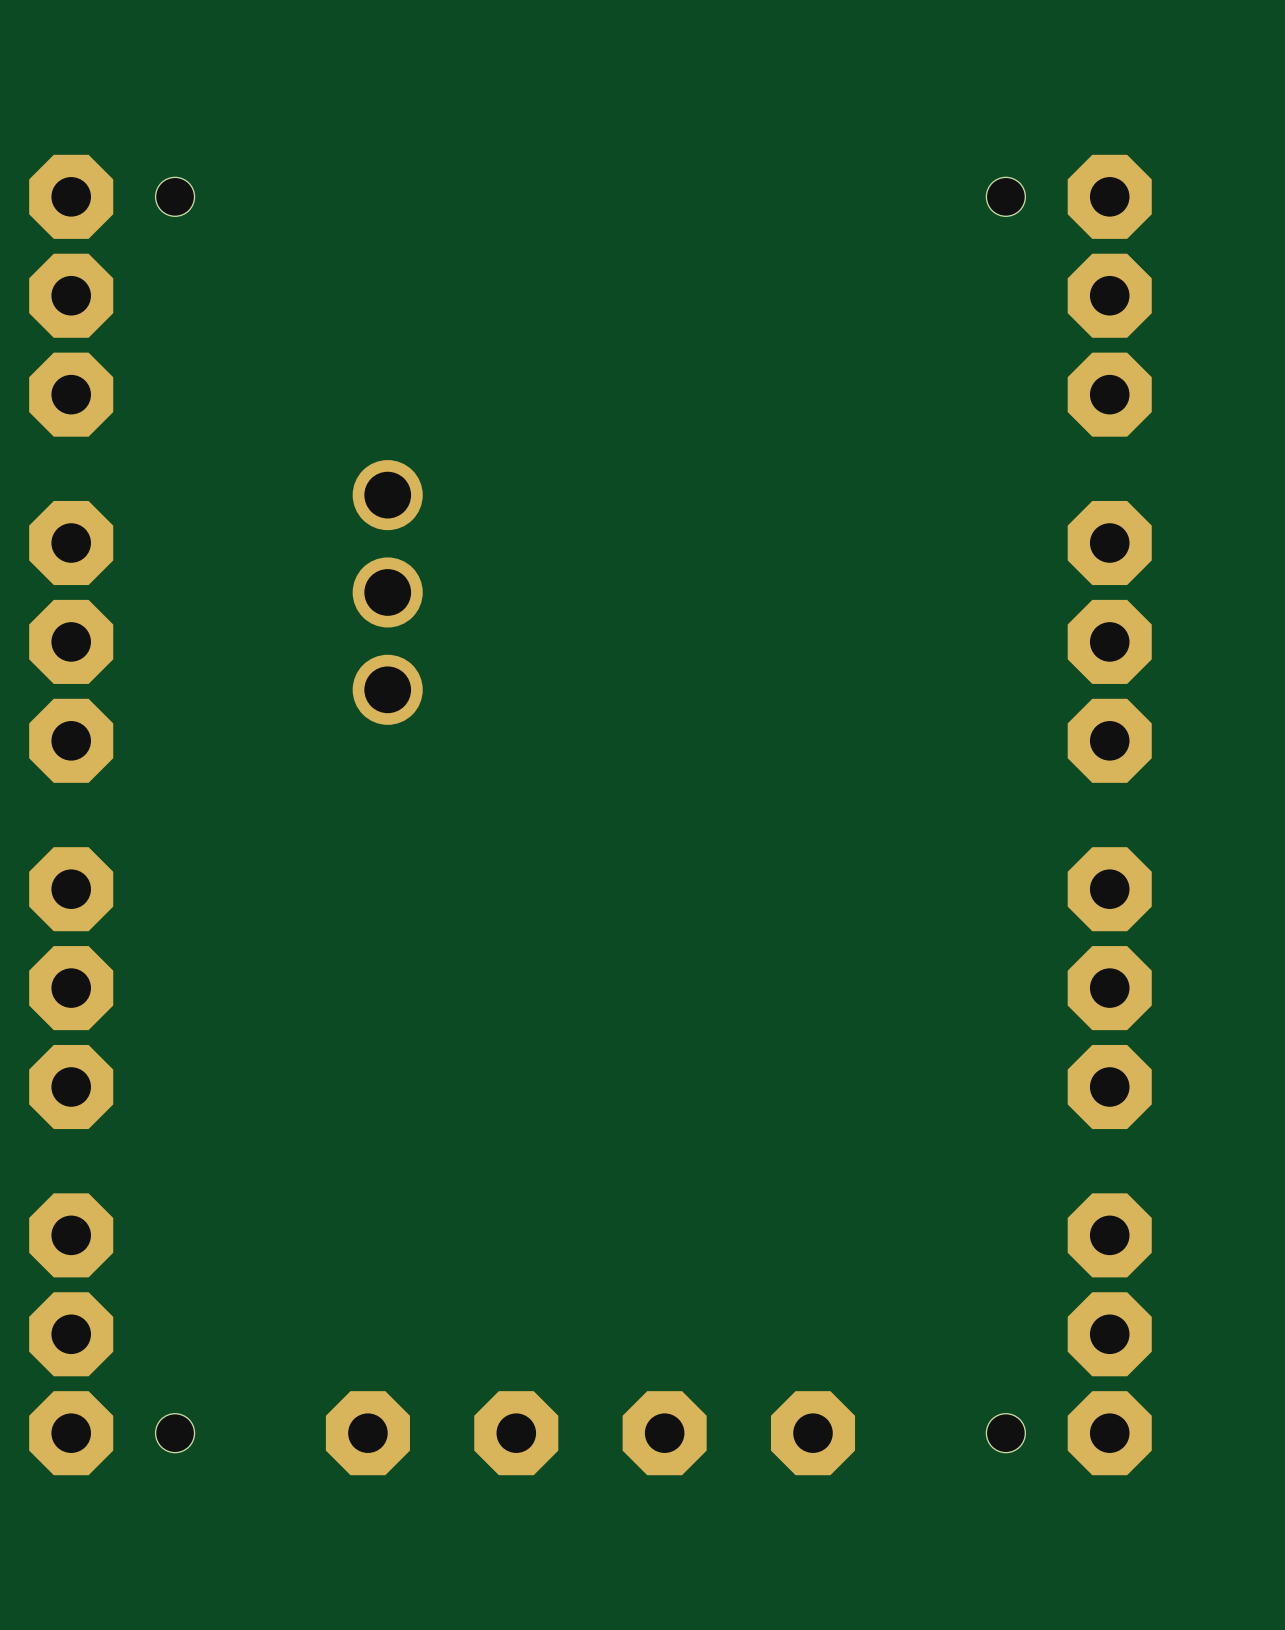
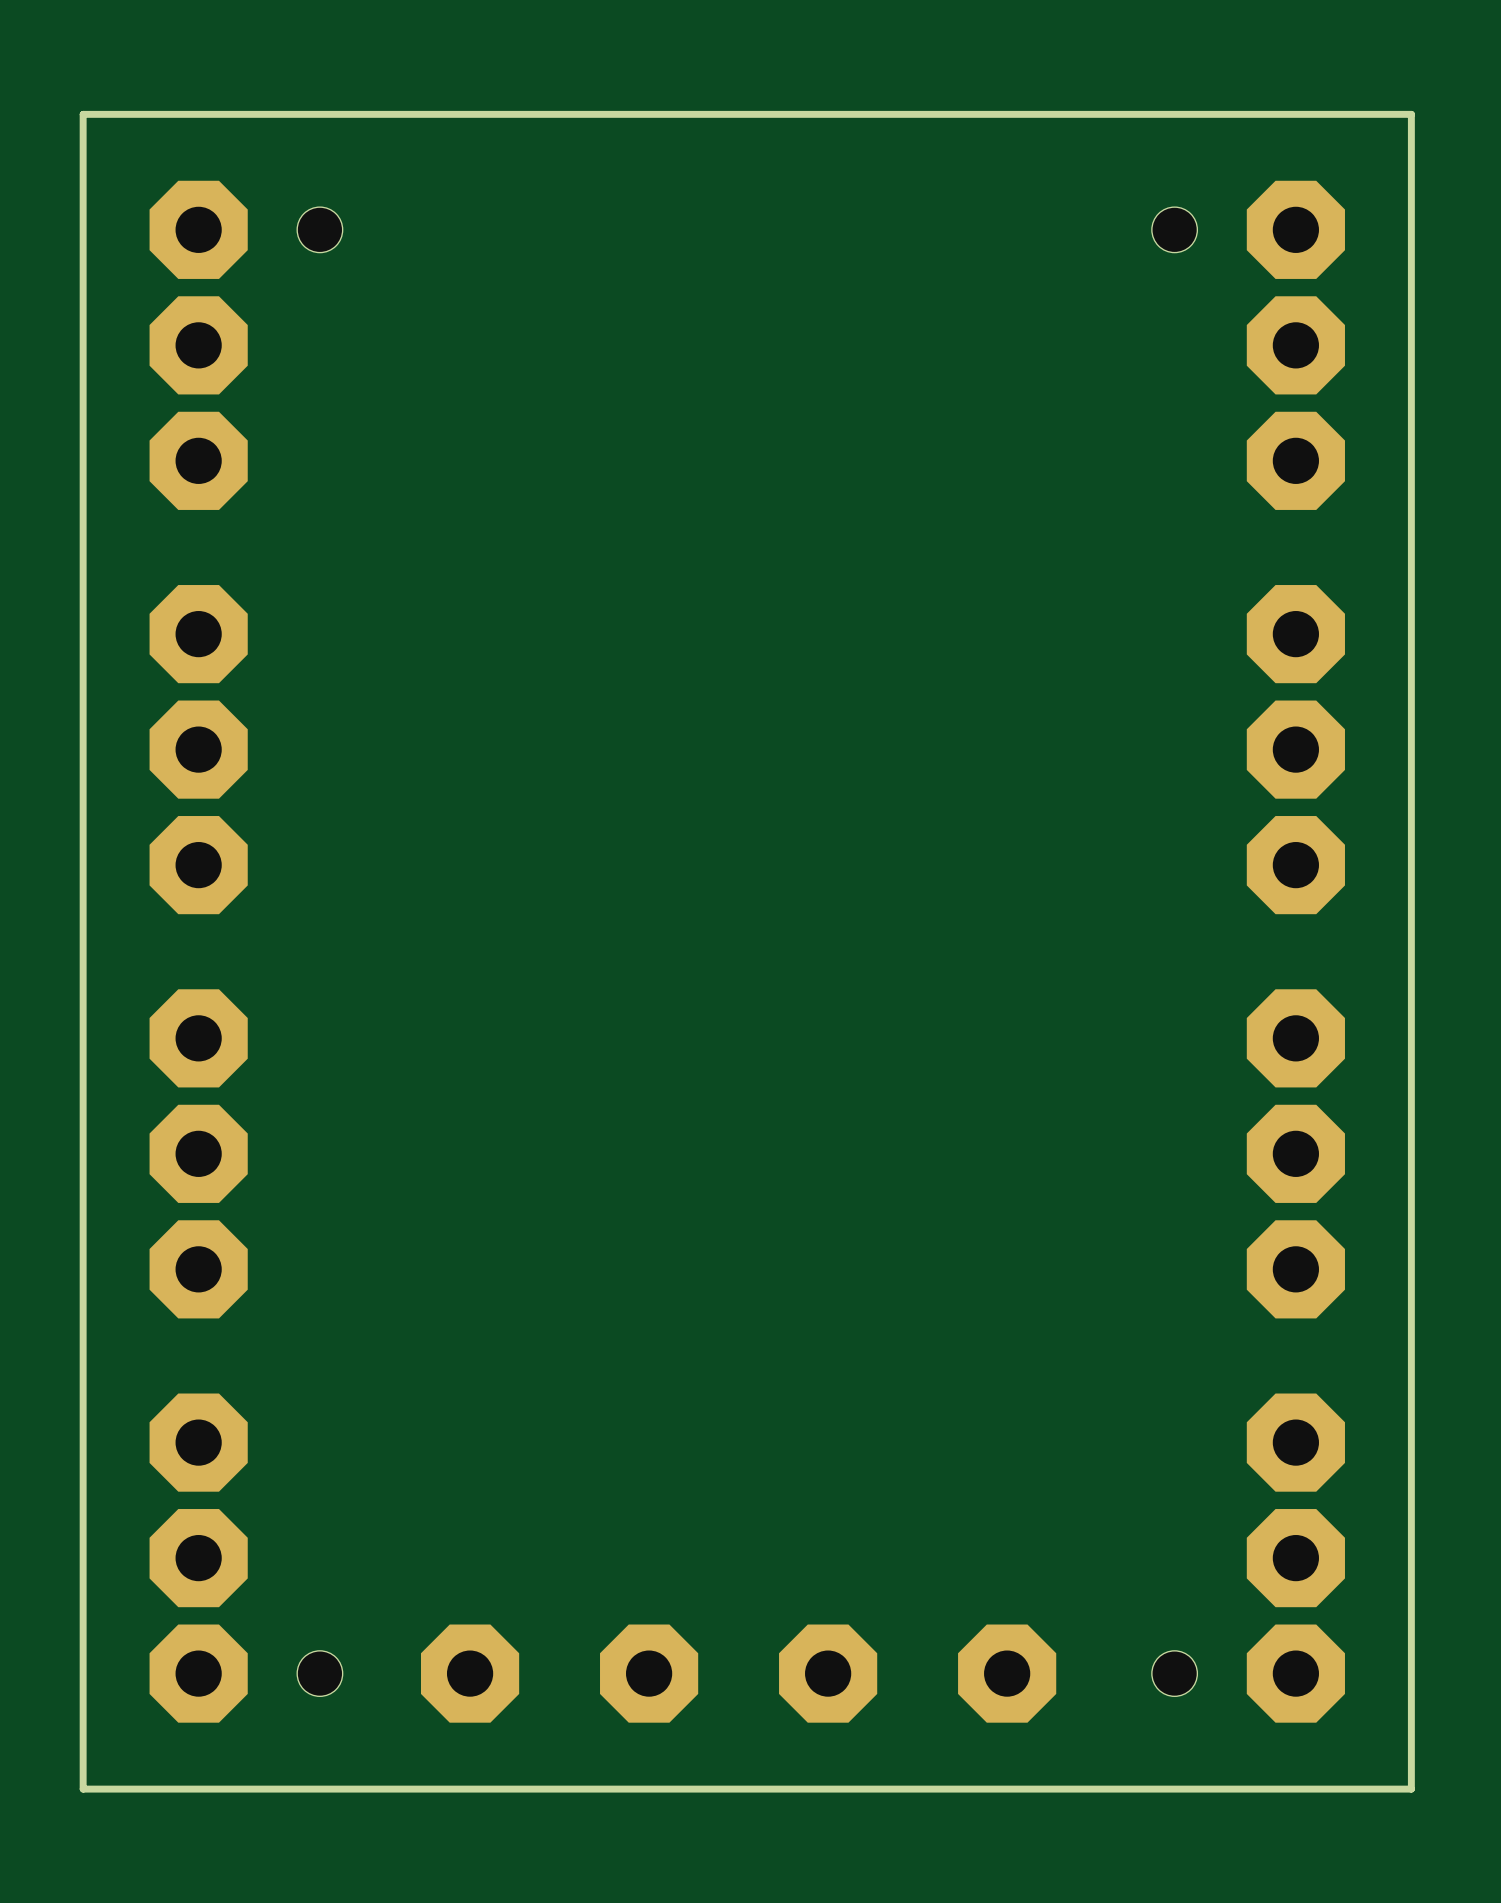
board edge: none -> (1411, 114) (1411, 1789) (83, 1789) (83, 114) (1411, 114)
part: (71, 196) -> none
part: none -> (198, 229)
hole position: (175, 196) -> (319, 229)
part: (71, 295) -> none
part: none -> (198, 345)
part: (71, 394) -> none
part: none -> (198, 460)
part: (71, 543) -> none
part: none -> (198, 634)
part: (387, 592) -> none
part: (71, 641) -> none
part: none -> (198, 749)
part: (71, 740) -> none
part: none -> (198, 865)
part: (71, 889) -> none
part: none -> (198, 1038)
part: (71, 988) -> none
part: none -> (198, 1153)
part: (71, 1087) -> none
part: none -> (198, 1269)
part: (71, 1235) -> none
part: none -> (198, 1442)
part: (71, 1334) -> none
part: none -> (198, 1558)
part: (71, 1433) -> none
part: none -> (198, 1673)
hole position: (175, 1433) -> (319, 1673)
part position: (367, 1433) -> (470, 1673)
part position: (516, 1433) -> (649, 1673)
part position: (664, 1433) -> (828, 1673)
part position: (813, 1433) -> (1007, 1673)

